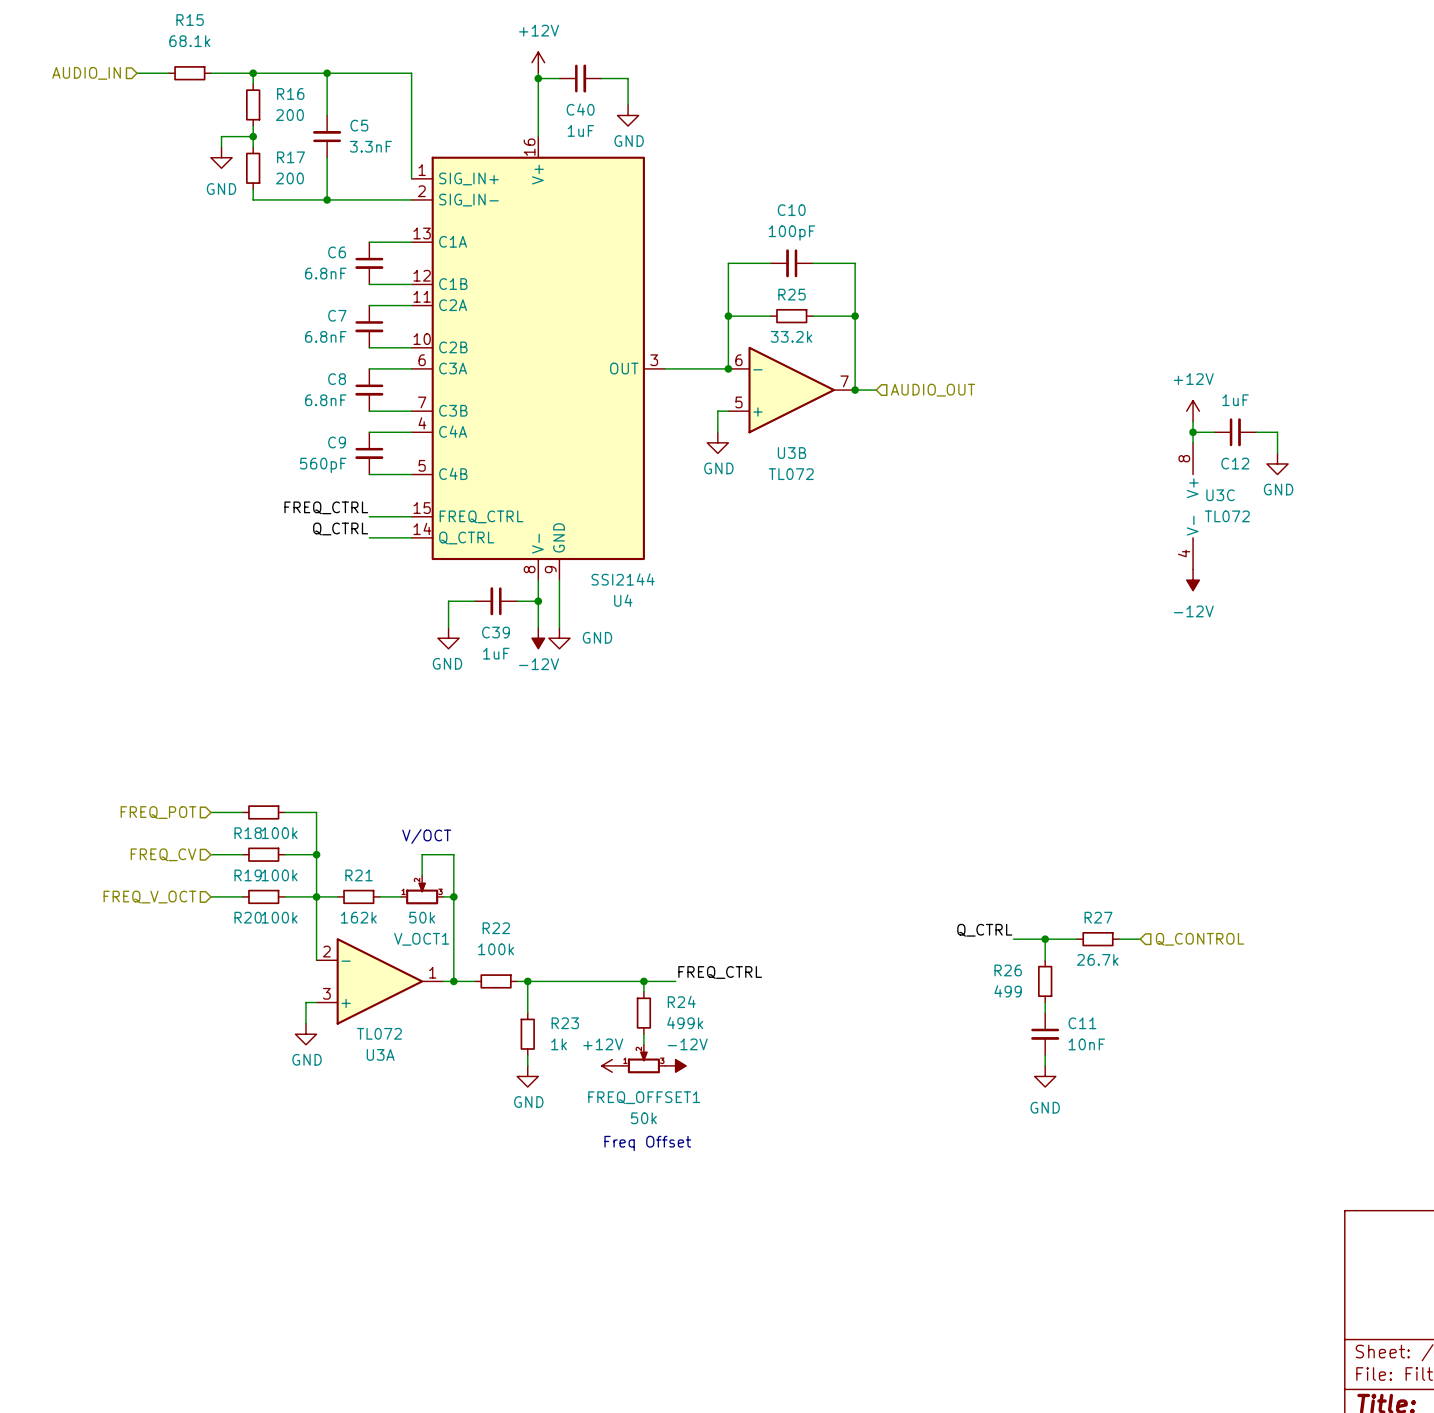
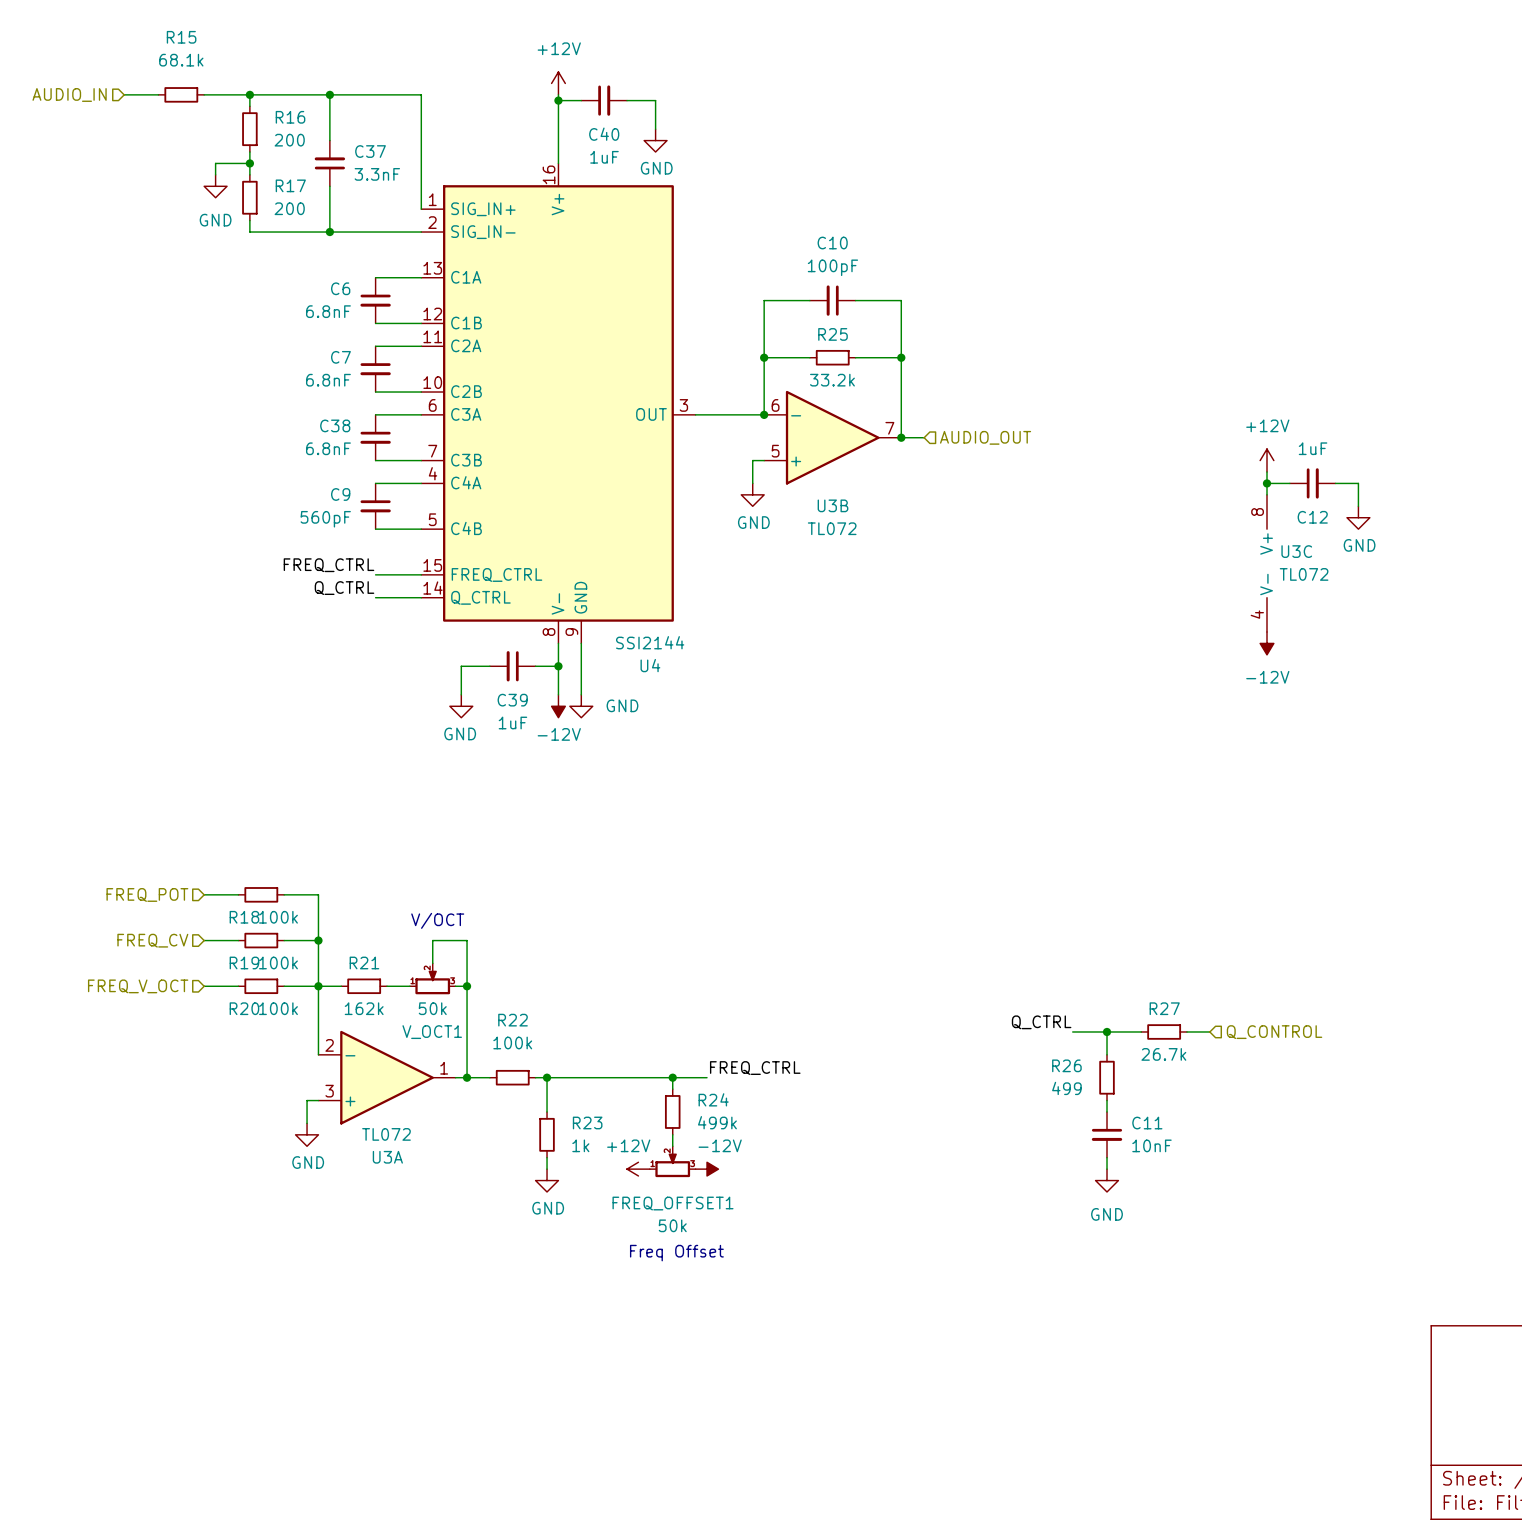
C5 name: C5 (359, 125) -> C37 (370, 151)
C8 name: C8 (337, 379) -> C38 (335, 425)

